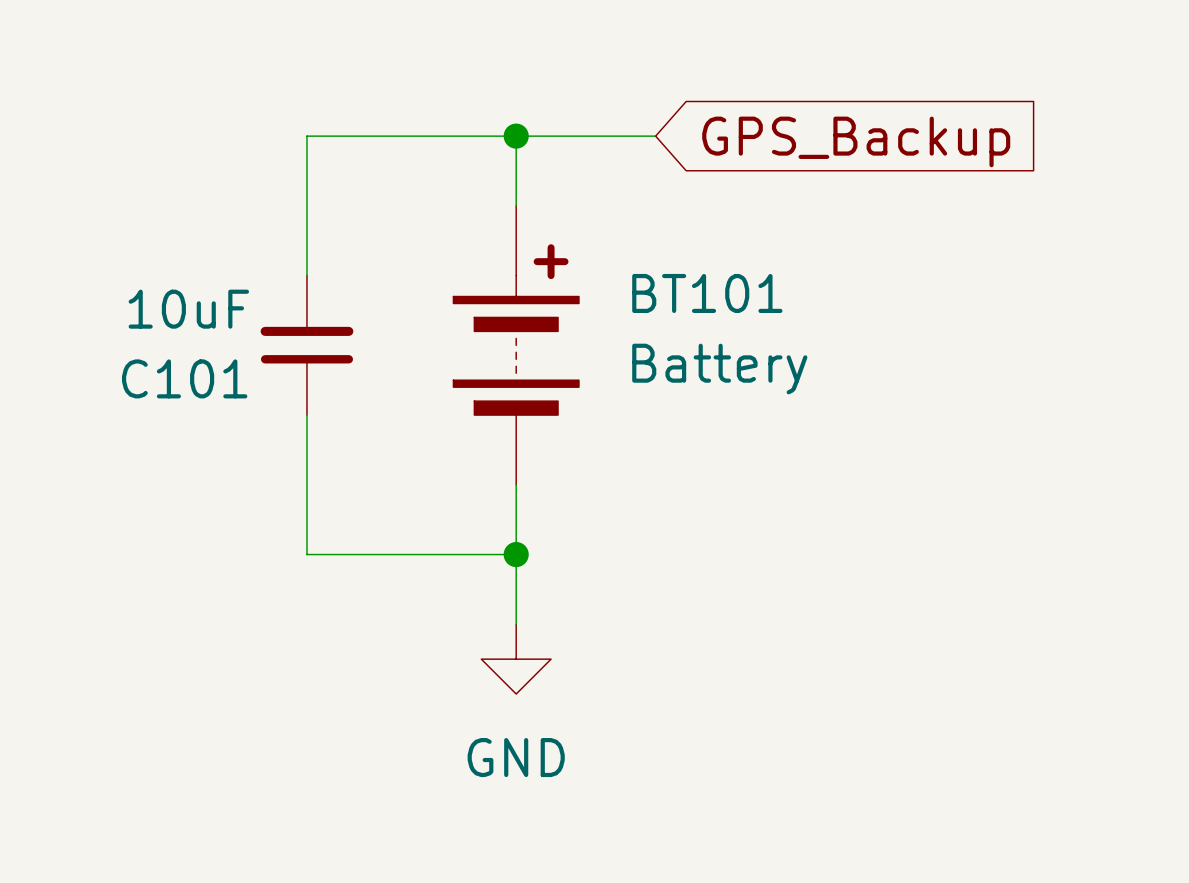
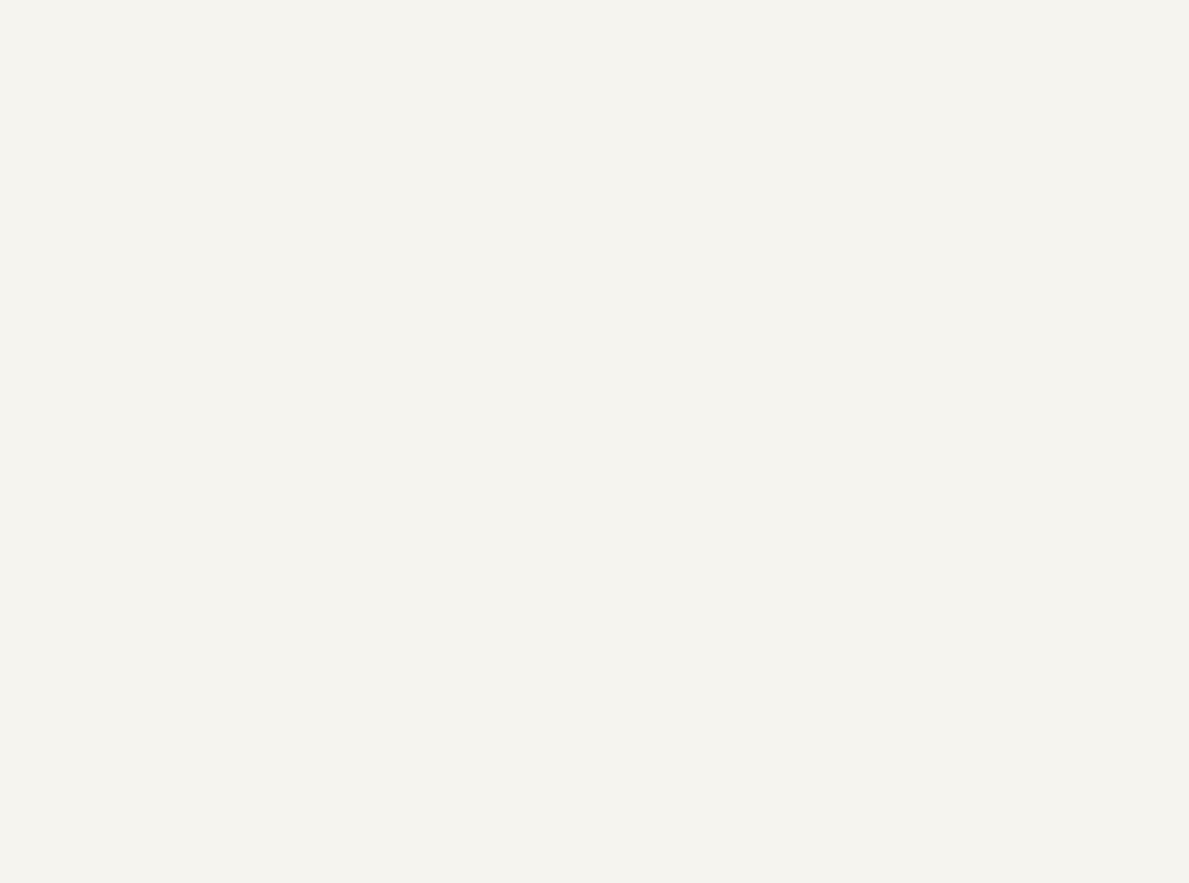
wire: (516, 136) (516, 205) -> none
junction: (516, 136) -> none
wire: (655, 136) (306, 136) (306, 275) -> none
global label: GPS_Backup (856, 141) -> none
C101: 10uF (306, 345) -> none
BT101: Battery (516, 345) -> none
wire: (306, 415) (306, 554) (516, 554) -> none
wire: (516, 484) (516, 624) -> none
junction: (516, 554) -> none
power symbol: GND (516, 659) -> none

